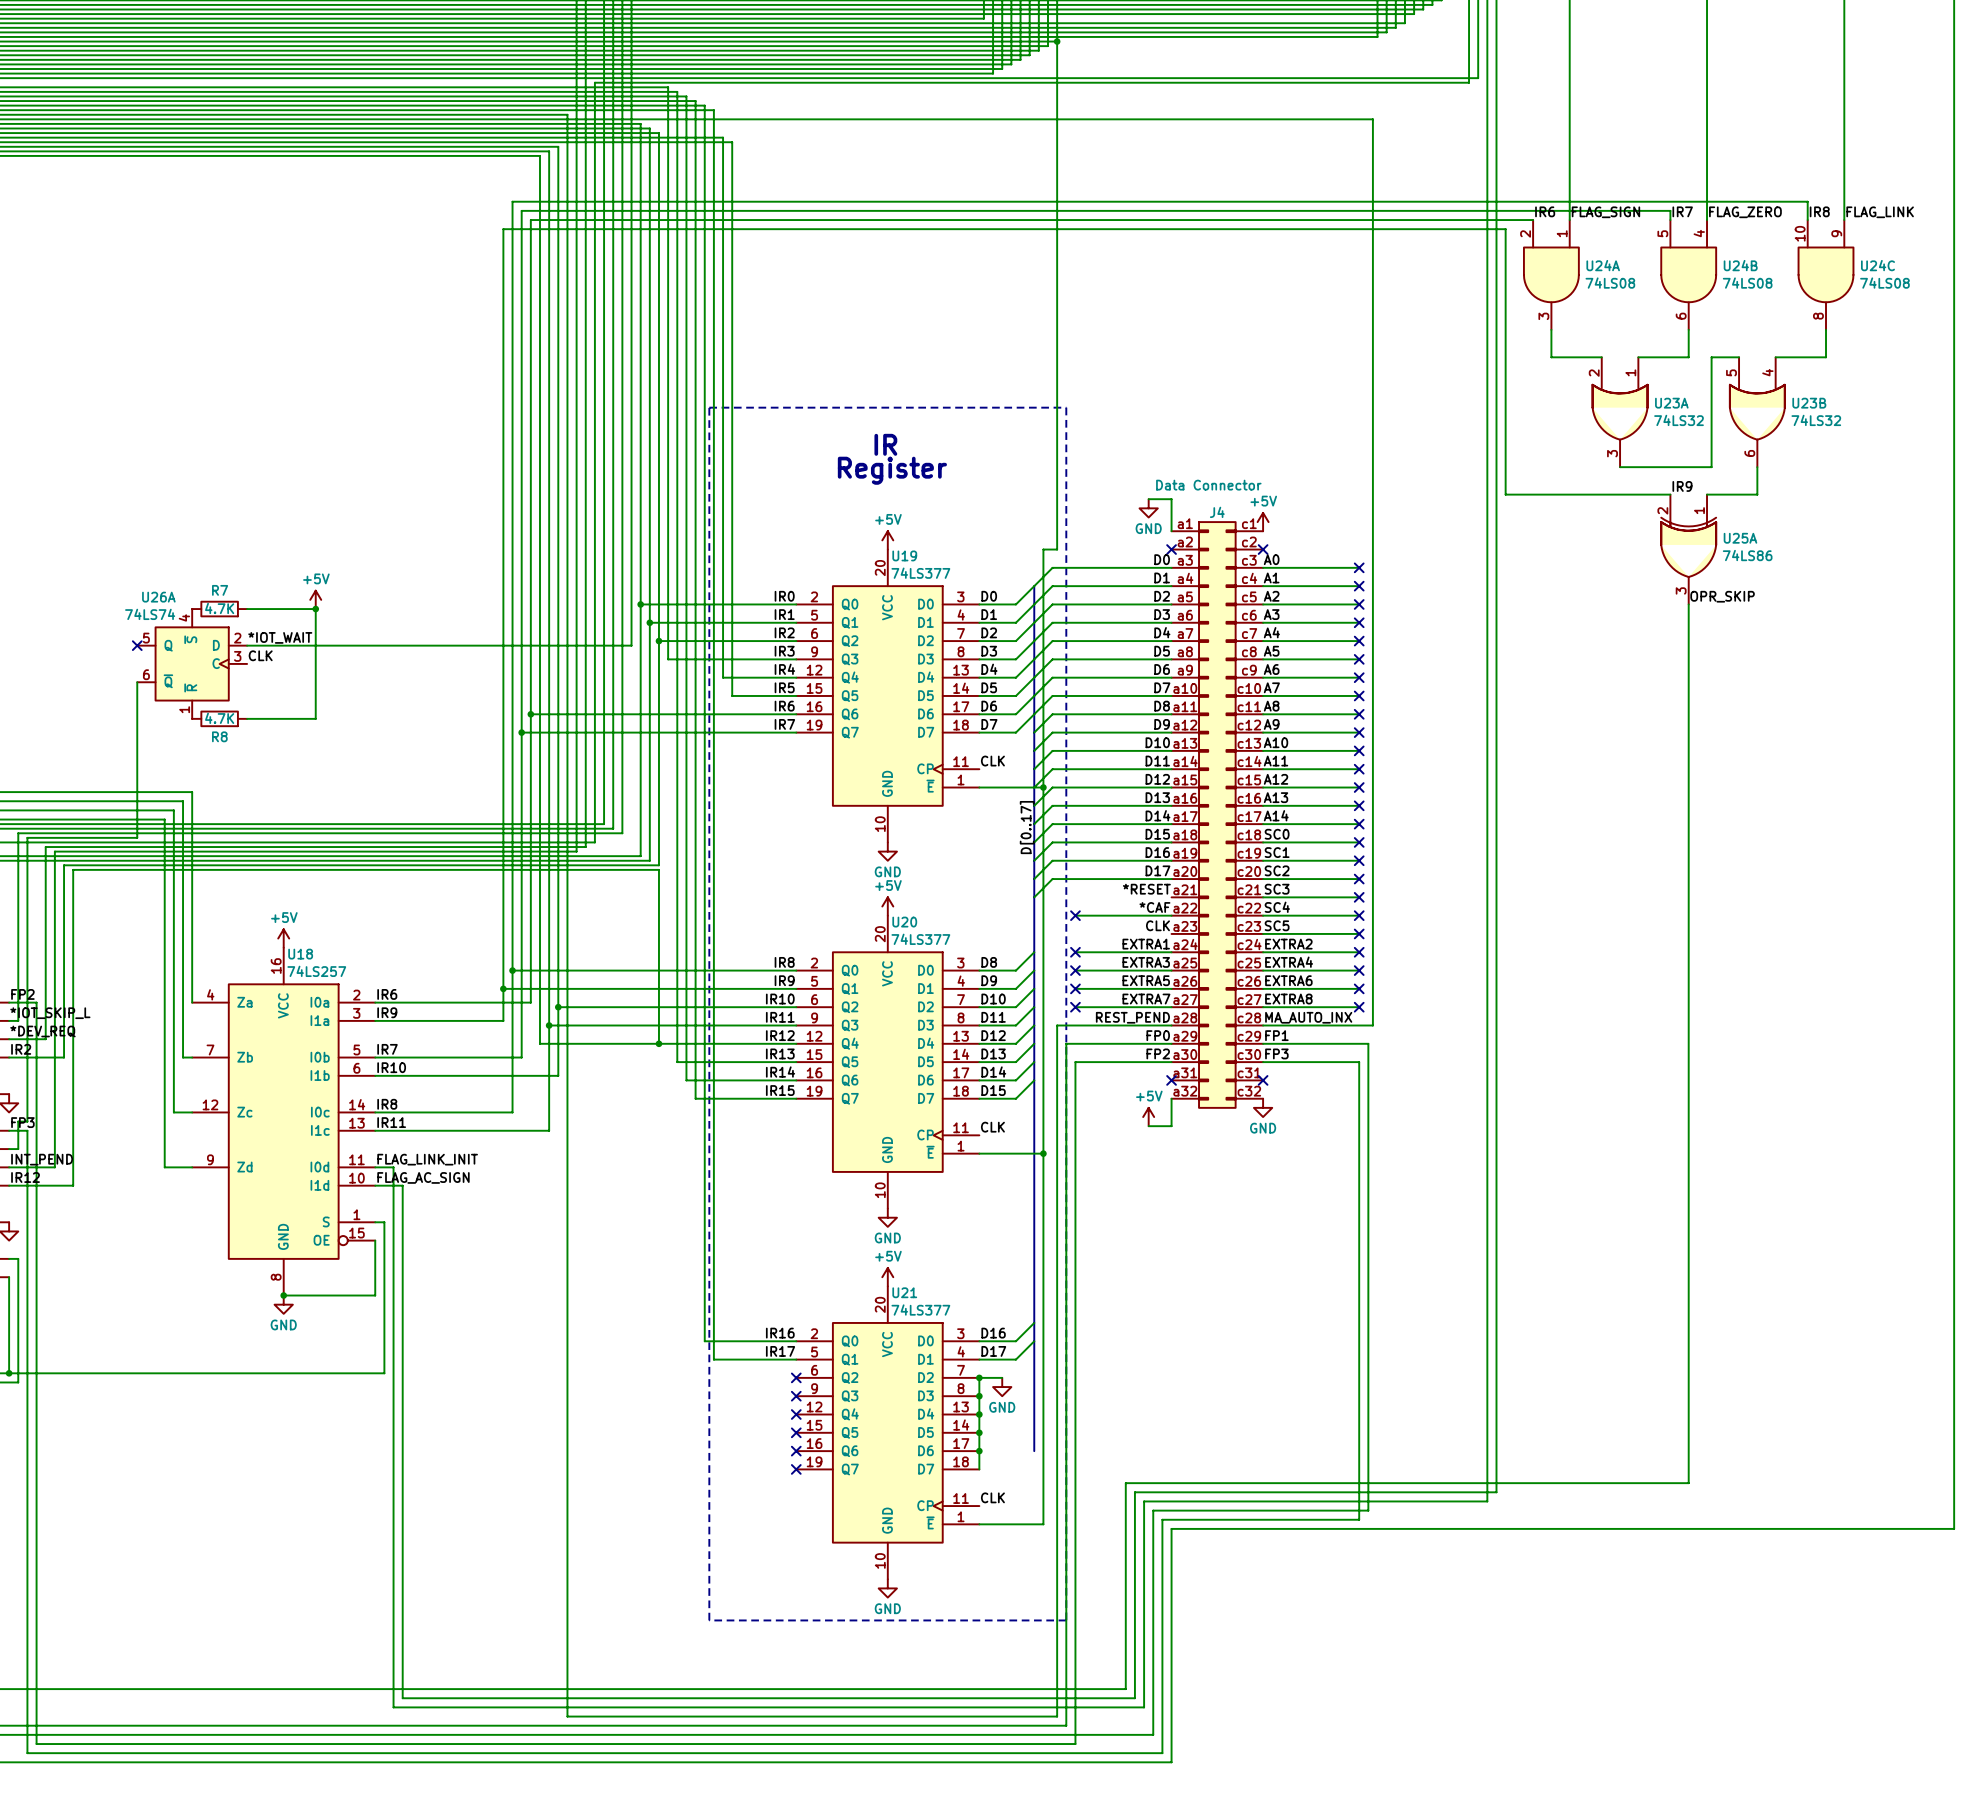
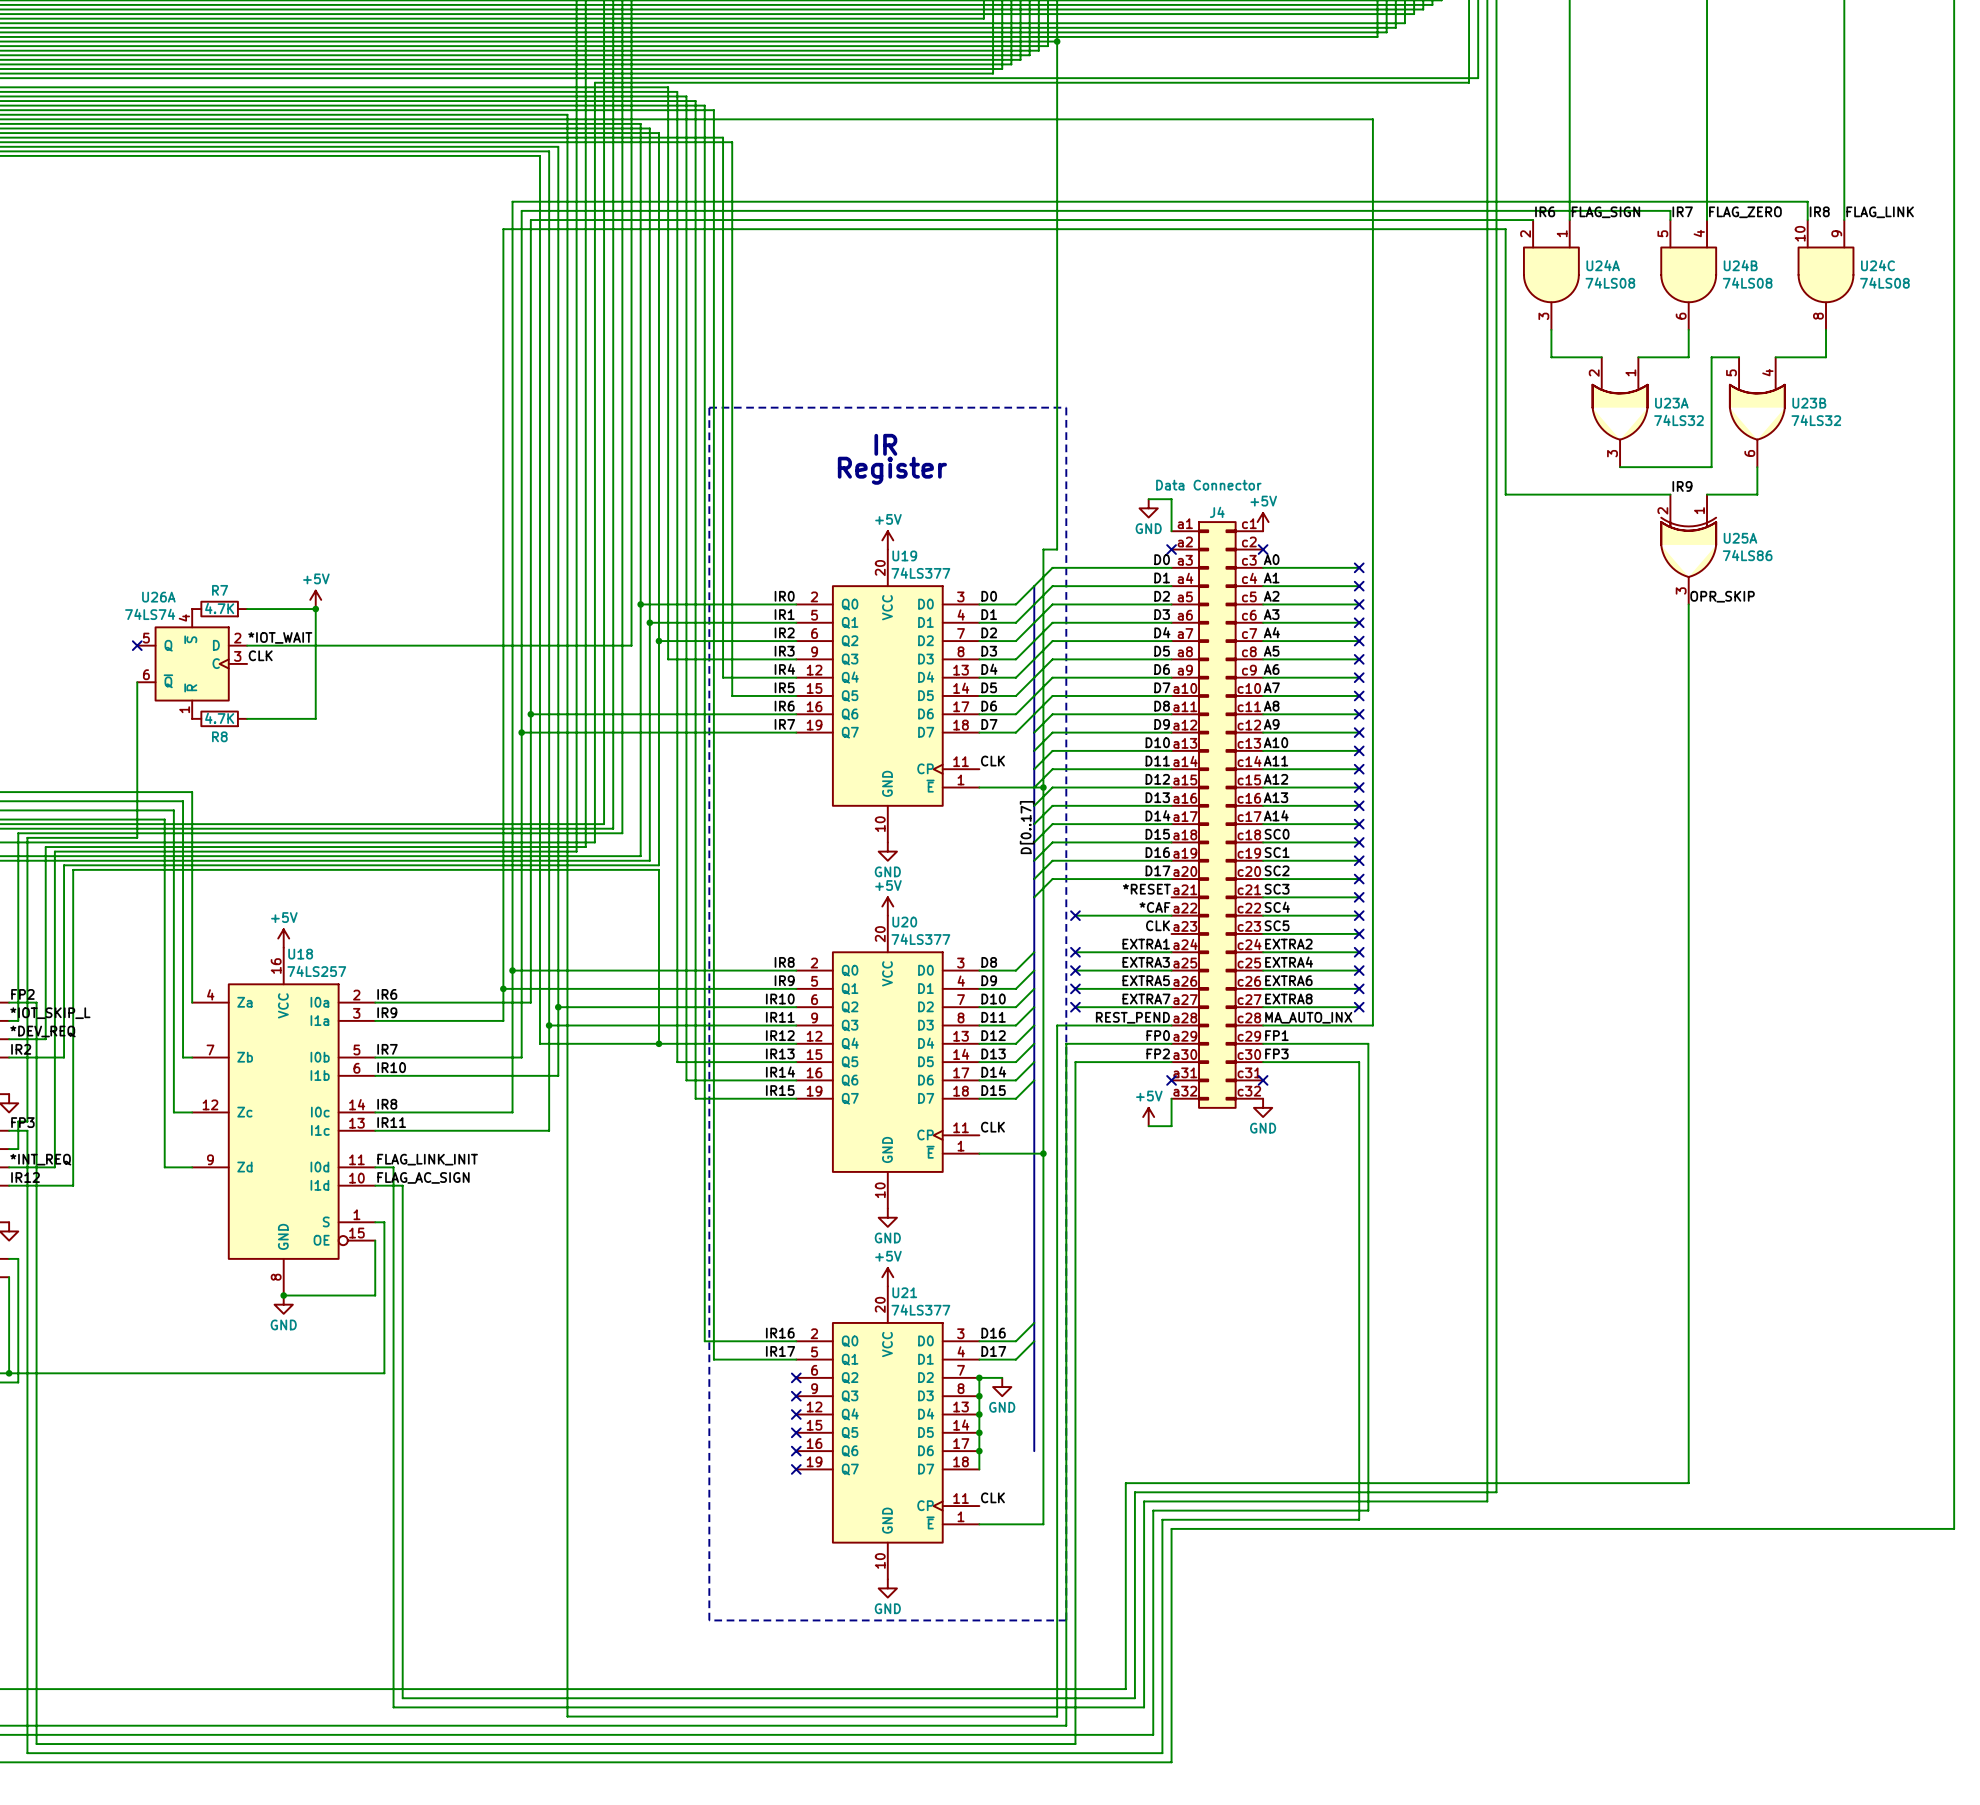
label: INT_PEND (42, 1159) -> *INT_REQ (40, 1159)

